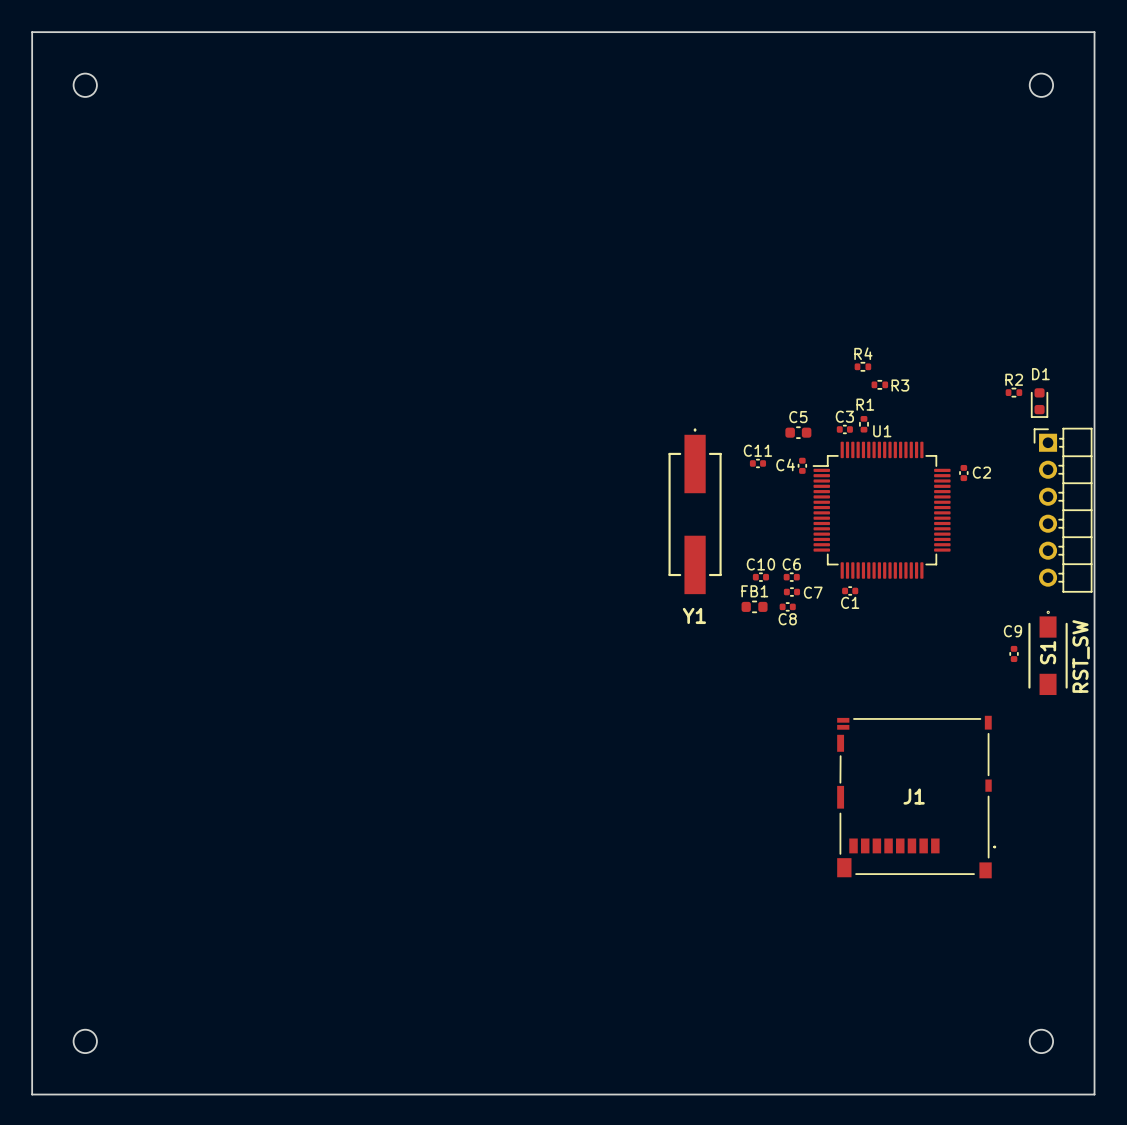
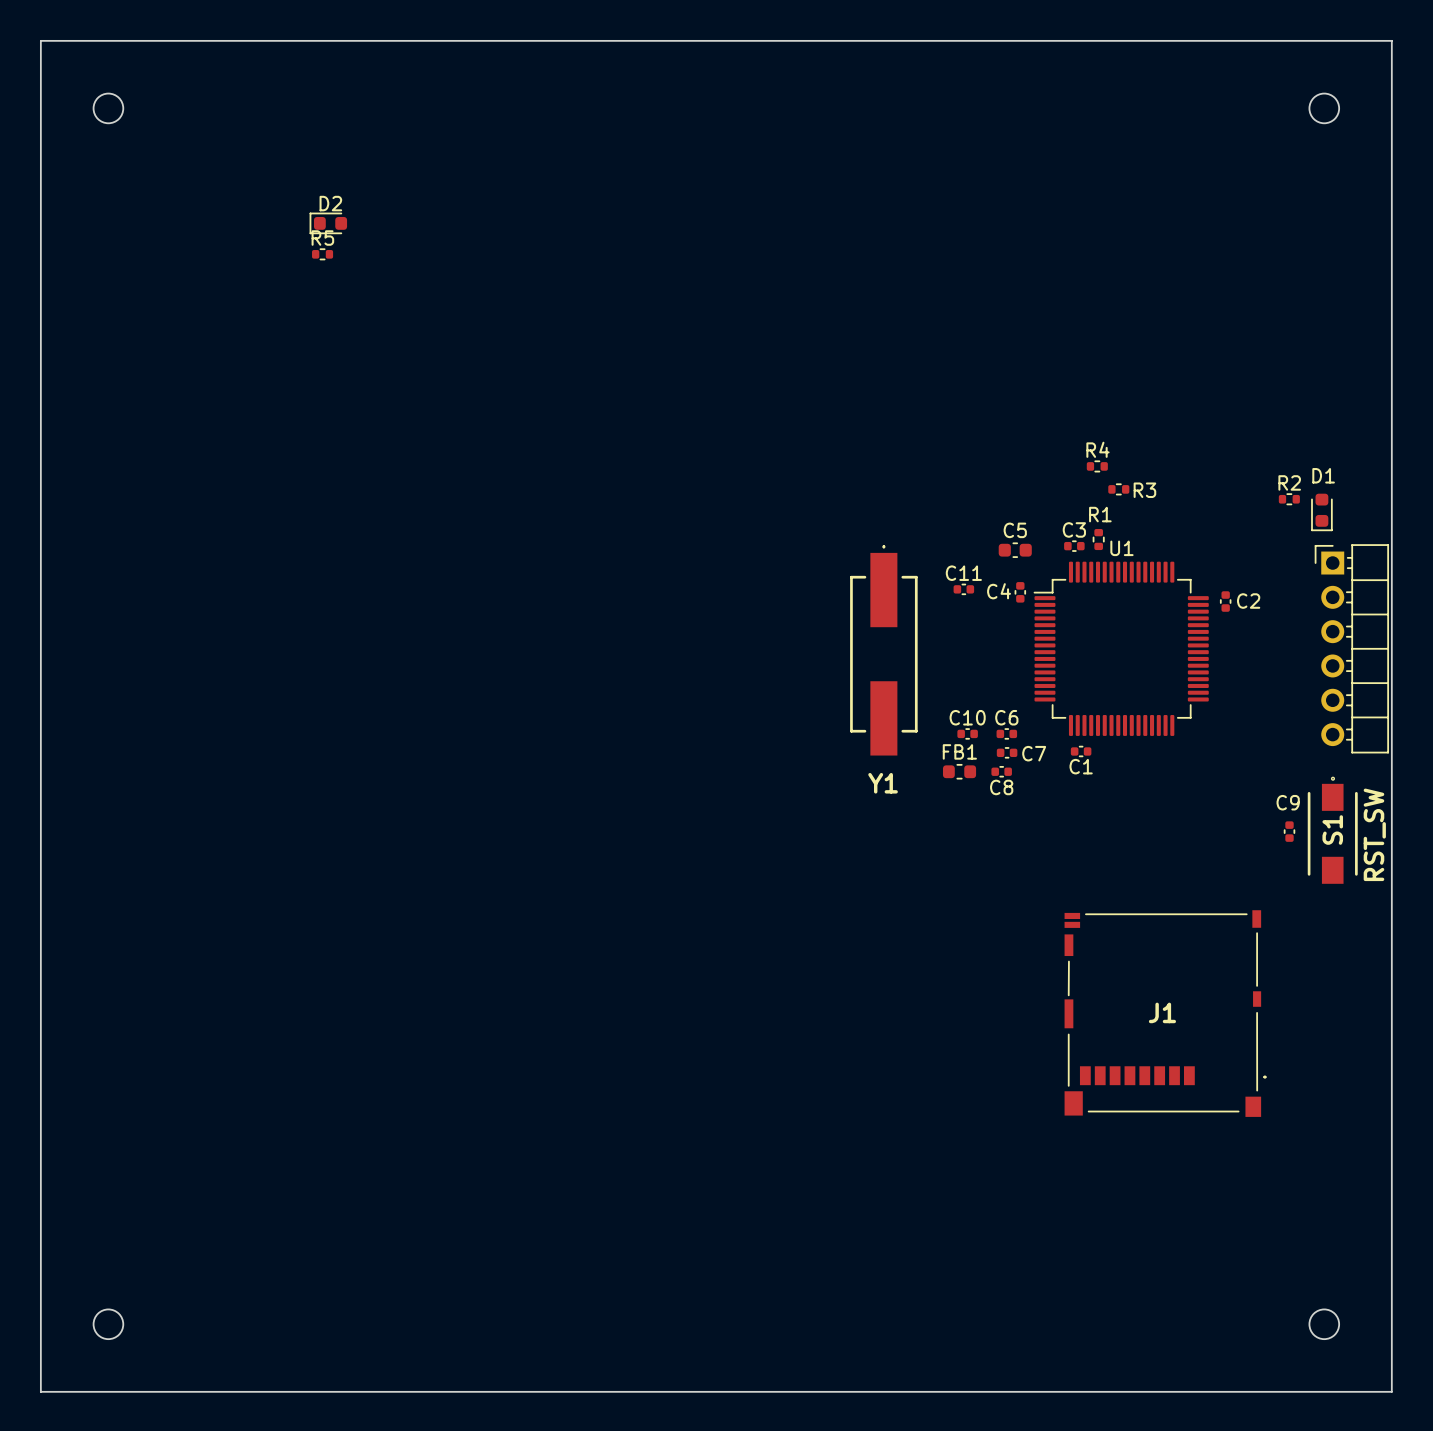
D2: none -> (328, 223)
R5: none -> (322, 254)

